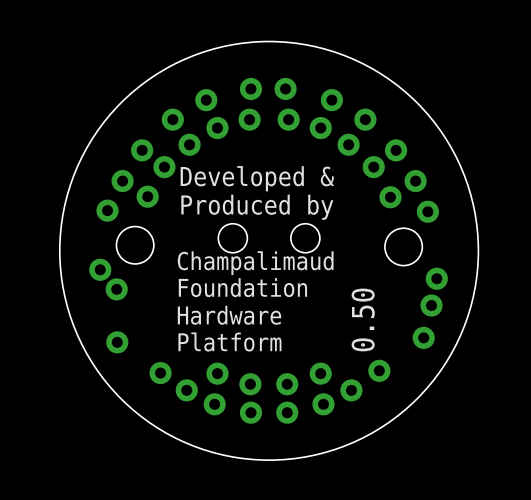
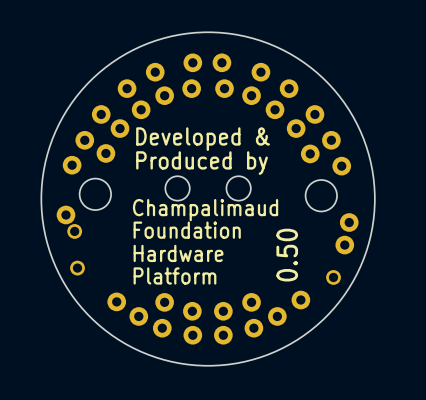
round board edge size: [59, 41, 479, 461] -> [41, 32, 375, 366]
part footprint: [105, 278, 128, 301] -> [67, 224, 83, 239]
part footprint: [412, 326, 435, 349] -> [326, 270, 341, 285]
part footprint: [106, 331, 129, 354] -> [70, 260, 85, 276]

